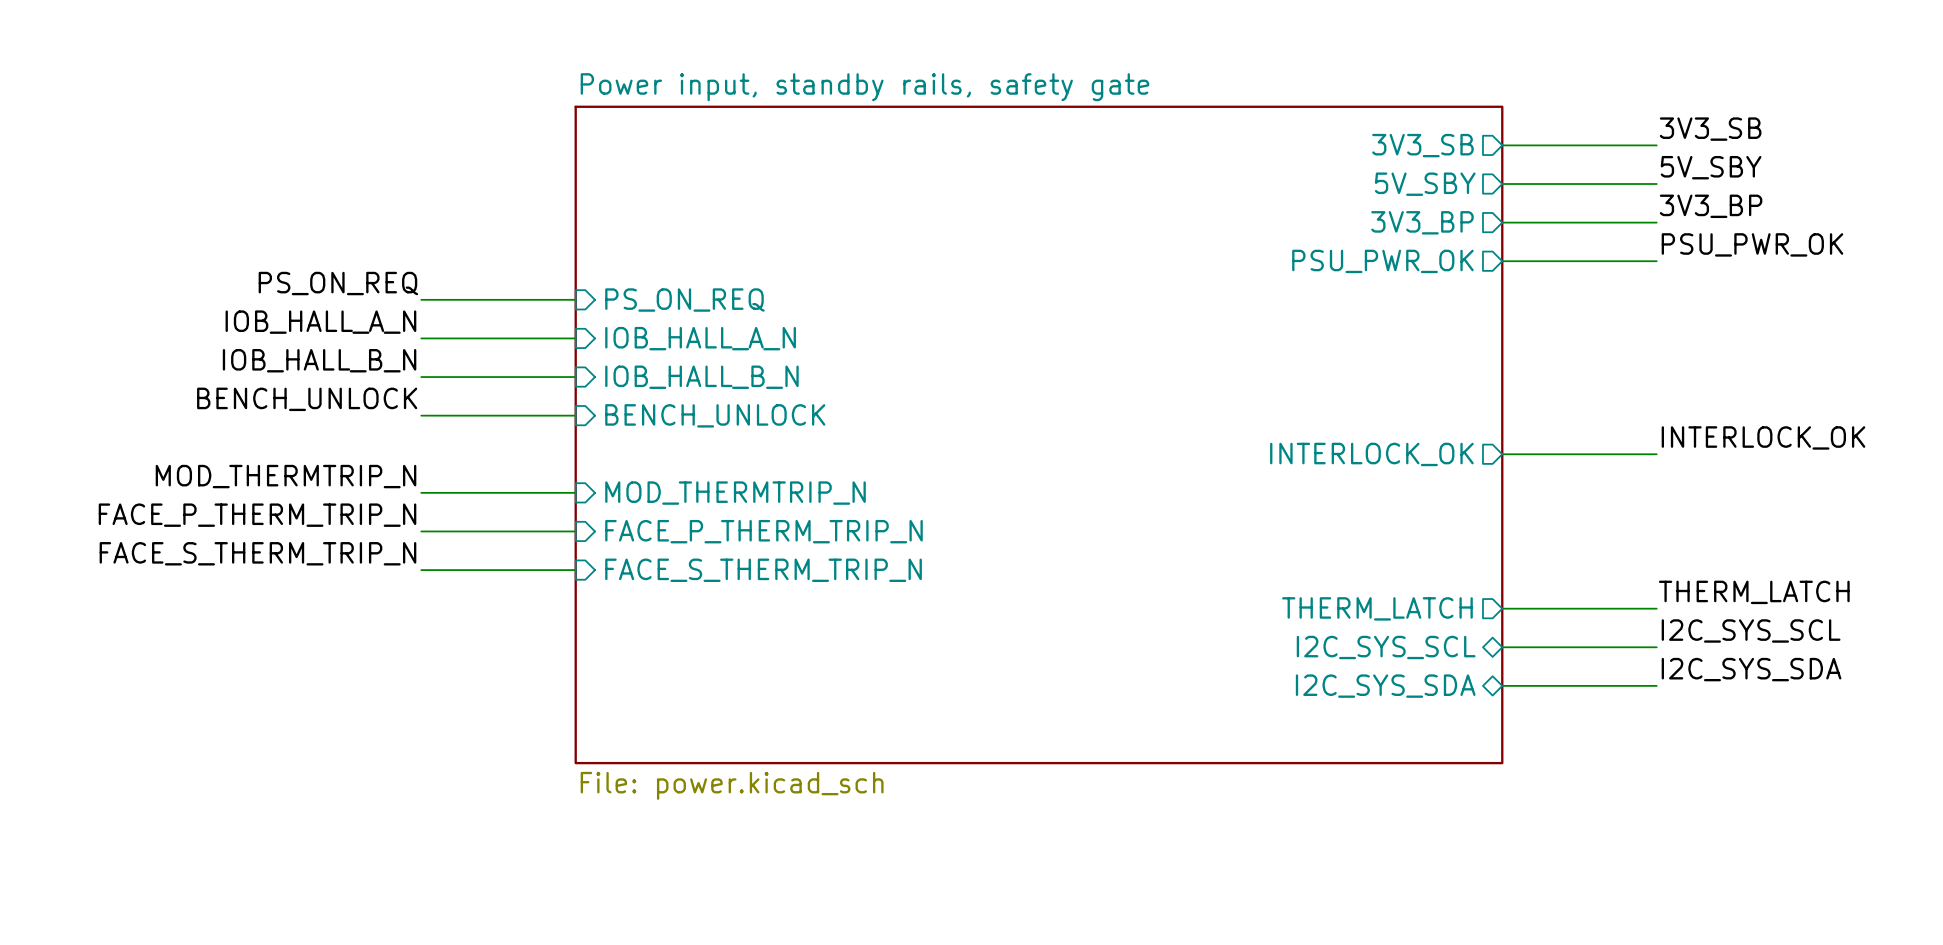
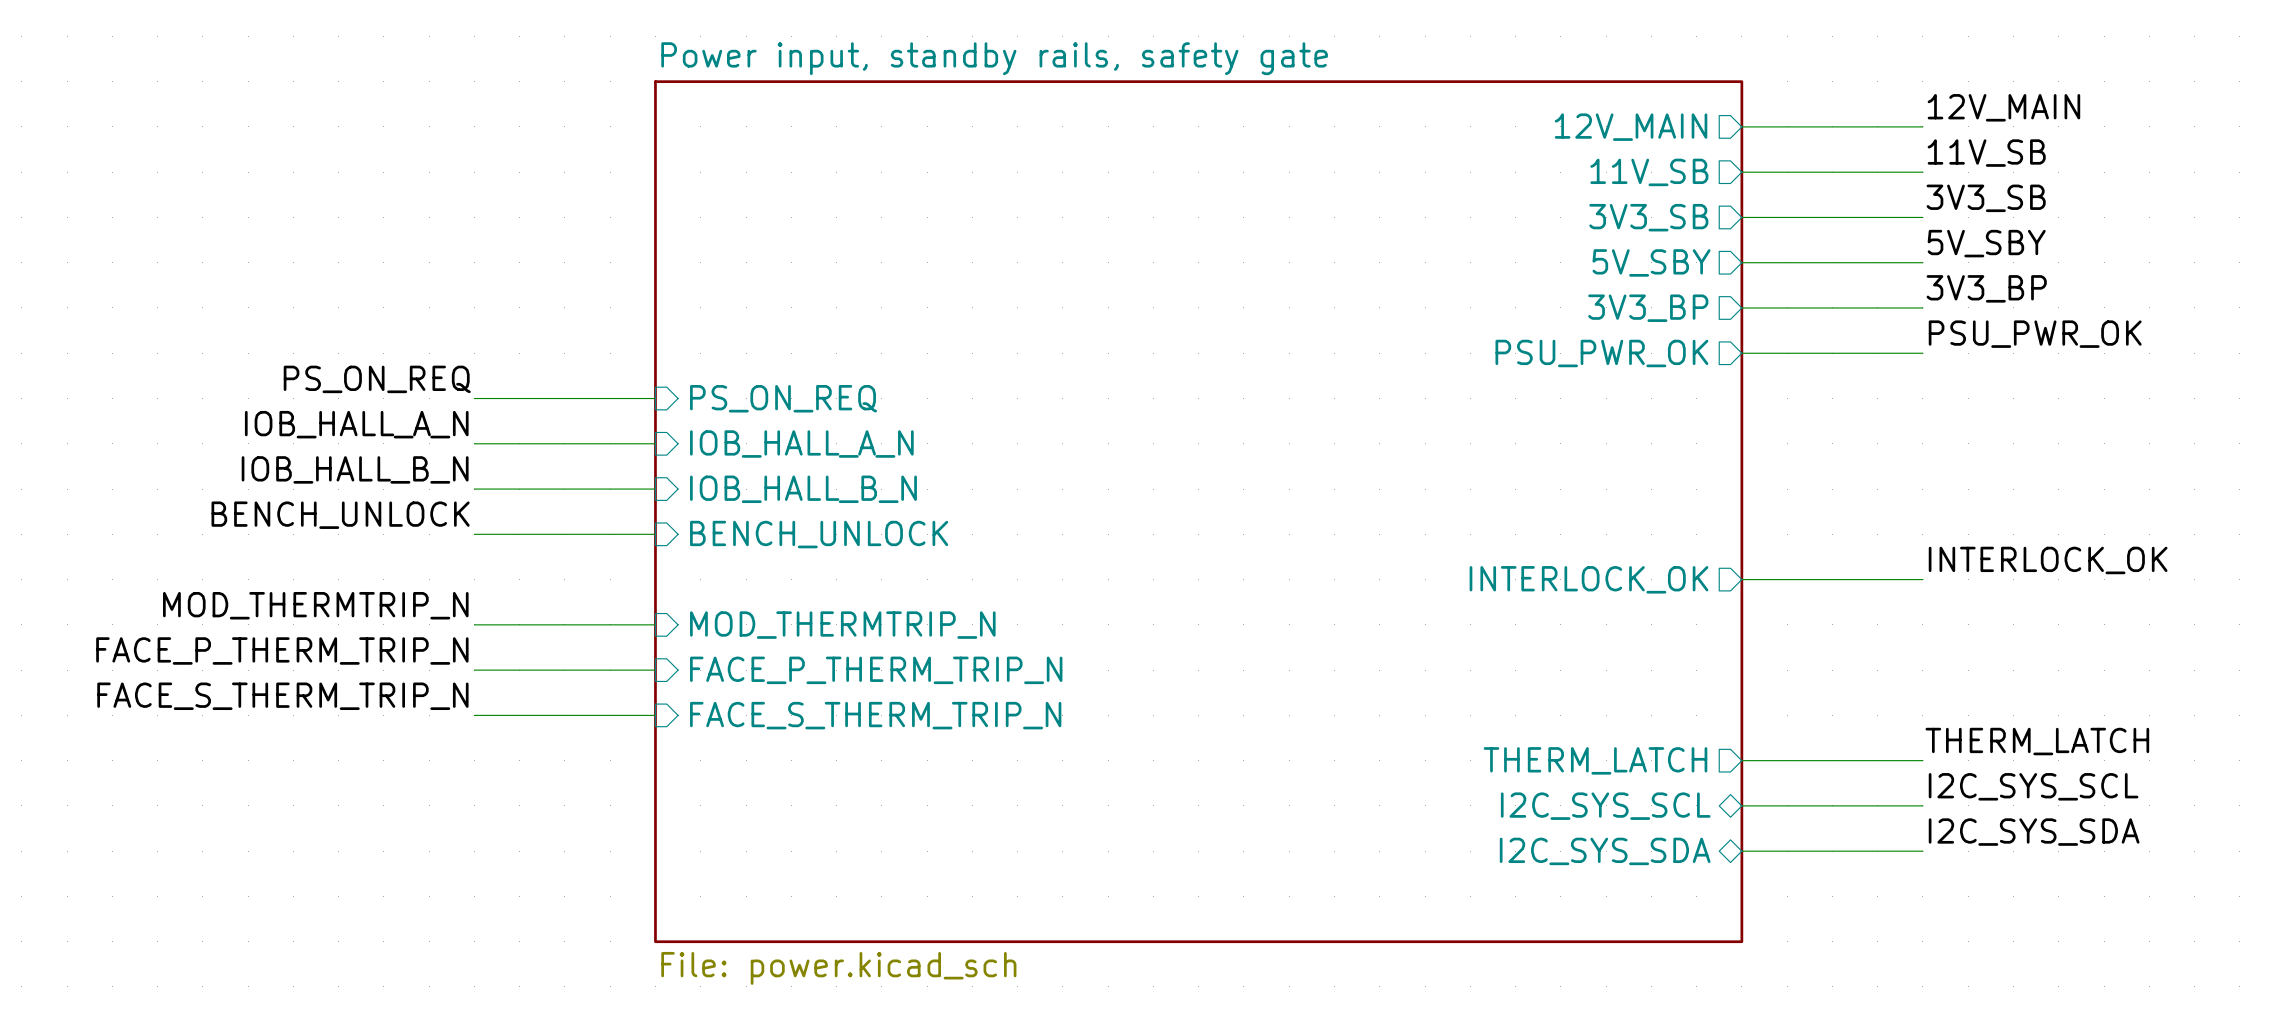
label: 3V3_SB (1710, 129) -> 12V_MAIN (2003, 107)
sheet pin: 3V3_SB (1422, 145) -> 12V_MAIN (1631, 127)
label: 5V_SBY (1711, 167) -> 11V_SB (1986, 153)
sheet pin: 5V_SBY (1425, 184) -> 11V_SB (1649, 172)
label: 3V3_BP (1711, 206) -> 3V3_SB (1986, 198)
sheet pin: 3V3_BP (1422, 222) -> 3V3_SB (1648, 217)
label: PSU_PWR_OK (1752, 244) -> 5V_SBY (1986, 243)
sheet pin: PSU_PWR_OK (1382, 261) -> 5V_SBY (1651, 262)
label: PS_ON_REQ (338, 283) -> none
label: none -> 3V3_BP (1986, 288)
wire: (421, 299) (575, 299) -> (474, 670) (655, 670)
wire: none -> (1741, 307) (1922, 307)
sheet pin: PS_ON_REQ (684, 300) -> none
sheet pin: none -> 3V3_BP (1648, 308)
label: IOB_HALL_A_N (320, 322) -> none
label: none -> PSU_PWR_OK (2035, 334)
wire: (421, 338) (575, 338) -> (474, 489) (655, 489)
sheet pin: IOB_HALL_A_N (700, 338) -> none
sheet pin: none -> PSU_PWR_OK (1601, 353)
wire: none -> (1741, 353) (1922, 353)
label: IOB_HALL_B_N (319, 360) -> PS_ON_REQ (377, 379)
sheet pin: IOB_HALL_B_N (701, 377) -> PS_ON_REQ (783, 398)
label: BENCH_UNLOCK (307, 399) -> IOB_HALL_A_N (356, 424)
sheet pin: BENCH_UNLOCK (715, 415) -> IOB_HALL_A_N (801, 444)
sheet Power input, standby rails, safety gate: File: power.kicad_sch (1038, 434) -> none
label: none -> IOB_HALL_B_N (355, 469)
label position: INTERLOCK_OK (1763, 437) -> INTERLOCK_OK (2048, 560)
sheet pin: none -> IOB_HALL_B_N (803, 489)
sheet pin position: INTERLOCK_OK (1371, 454) -> INTERLOCK_OK (1589, 579)
wire: (1502, 454) (1656, 454) -> (1741, 579) (1922, 579)
sheet Power input, standby rails, safety gate: none -> File: power.kicad_sch (1198, 511)
label: MOD_THERMTRIP_N (286, 476) -> BENCH_UNLOCK (340, 515)
sheet pin: MOD_THERMTRIP_N (735, 493) -> BENCH_UNLOCK (819, 534)
label position: FACE_P_THERM_TRIP_N (257, 515) -> FACE_P_THERM_TRIP_N (282, 651)
wire: (421, 531) (575, 531) -> (474, 715) (655, 715)
sheet pin position: FACE_P_THERM_TRIP_N (763, 531) -> FACE_P_THERM_TRIP_N (876, 670)
label: FACE_S_THERM_TRIP_N (257, 553) -> MOD_THERMTRIP_N (315, 605)
sheet pin: FACE_S_THERM_TRIP_N (763, 570) -> MOD_THERMTRIP_N (842, 625)
label: THERM_LATCH (1754, 592) -> none
sheet pin: THERM_LATCH (1377, 608) -> none
wire: (1502, 608) (1656, 608) -> (1741, 805) (1922, 805)
label: none -> FACE_S_THERM_TRIP_N (282, 696)
label position: I2C_SYS_SCL (1751, 630) -> I2C_SYS_SCL (2033, 786)
sheet pin: none -> FACE_S_THERM_TRIP_N (875, 715)
sheet pin position: I2C_SYS_SCL (1386, 647) -> I2C_SYS_SCL (1605, 806)
wire: (1502, 647) (1656, 647) -> (1741, 851) (1922, 851)
label: I2C_SYS_SDA (1751, 669) -> THERM_LATCH (2037, 741)
sheet pin shape: bidirectional (1385, 686) -> output (1595, 760)
sheet pin: I2C_SYS_SDA (1385, 686) -> THERM_LATCH (1595, 760)
label: none -> I2C_SYS_SDA (2034, 832)
sheet pin: none -> I2C_SYS_SDA (1605, 851)

